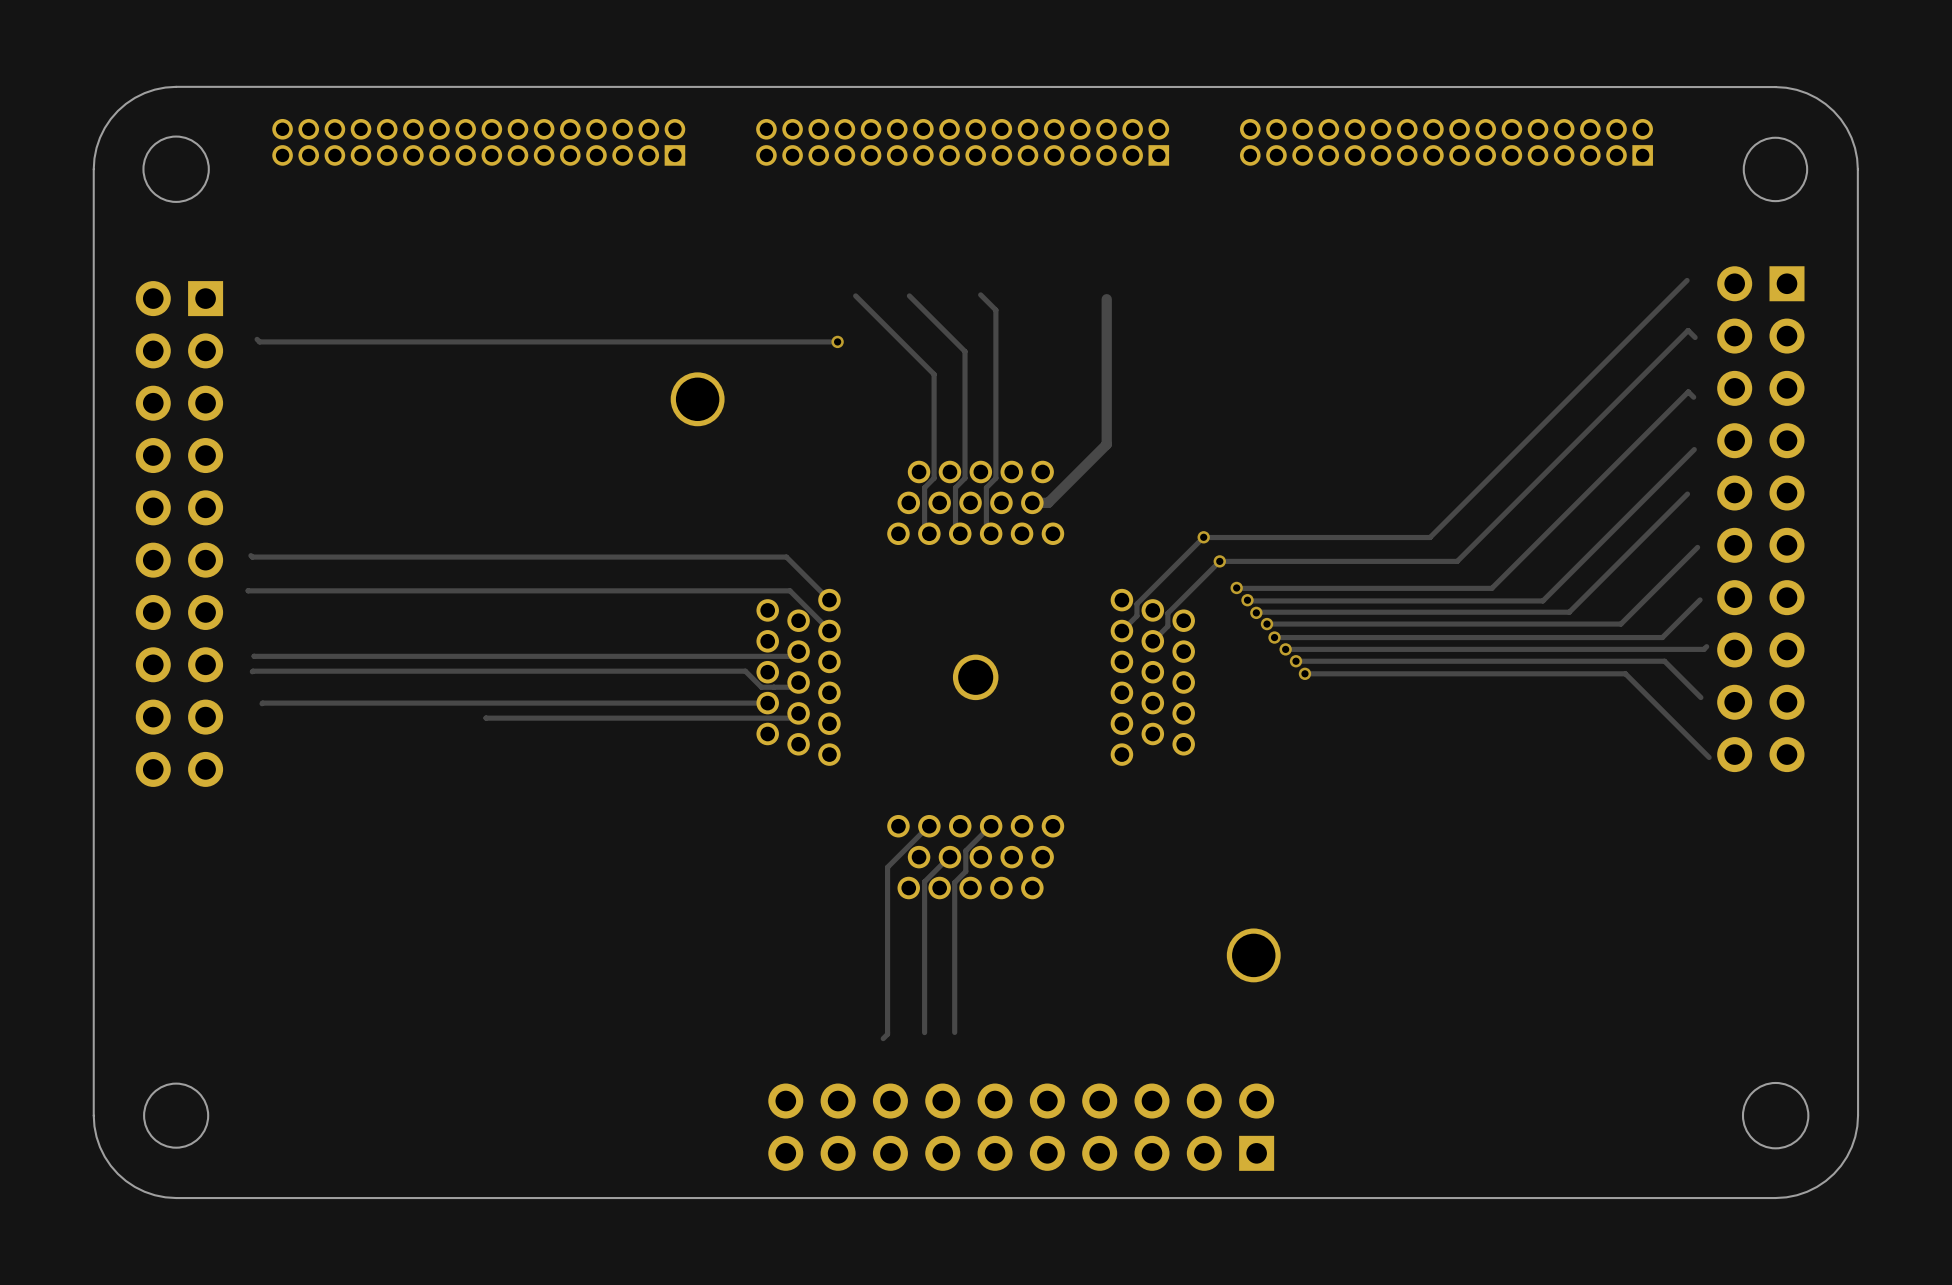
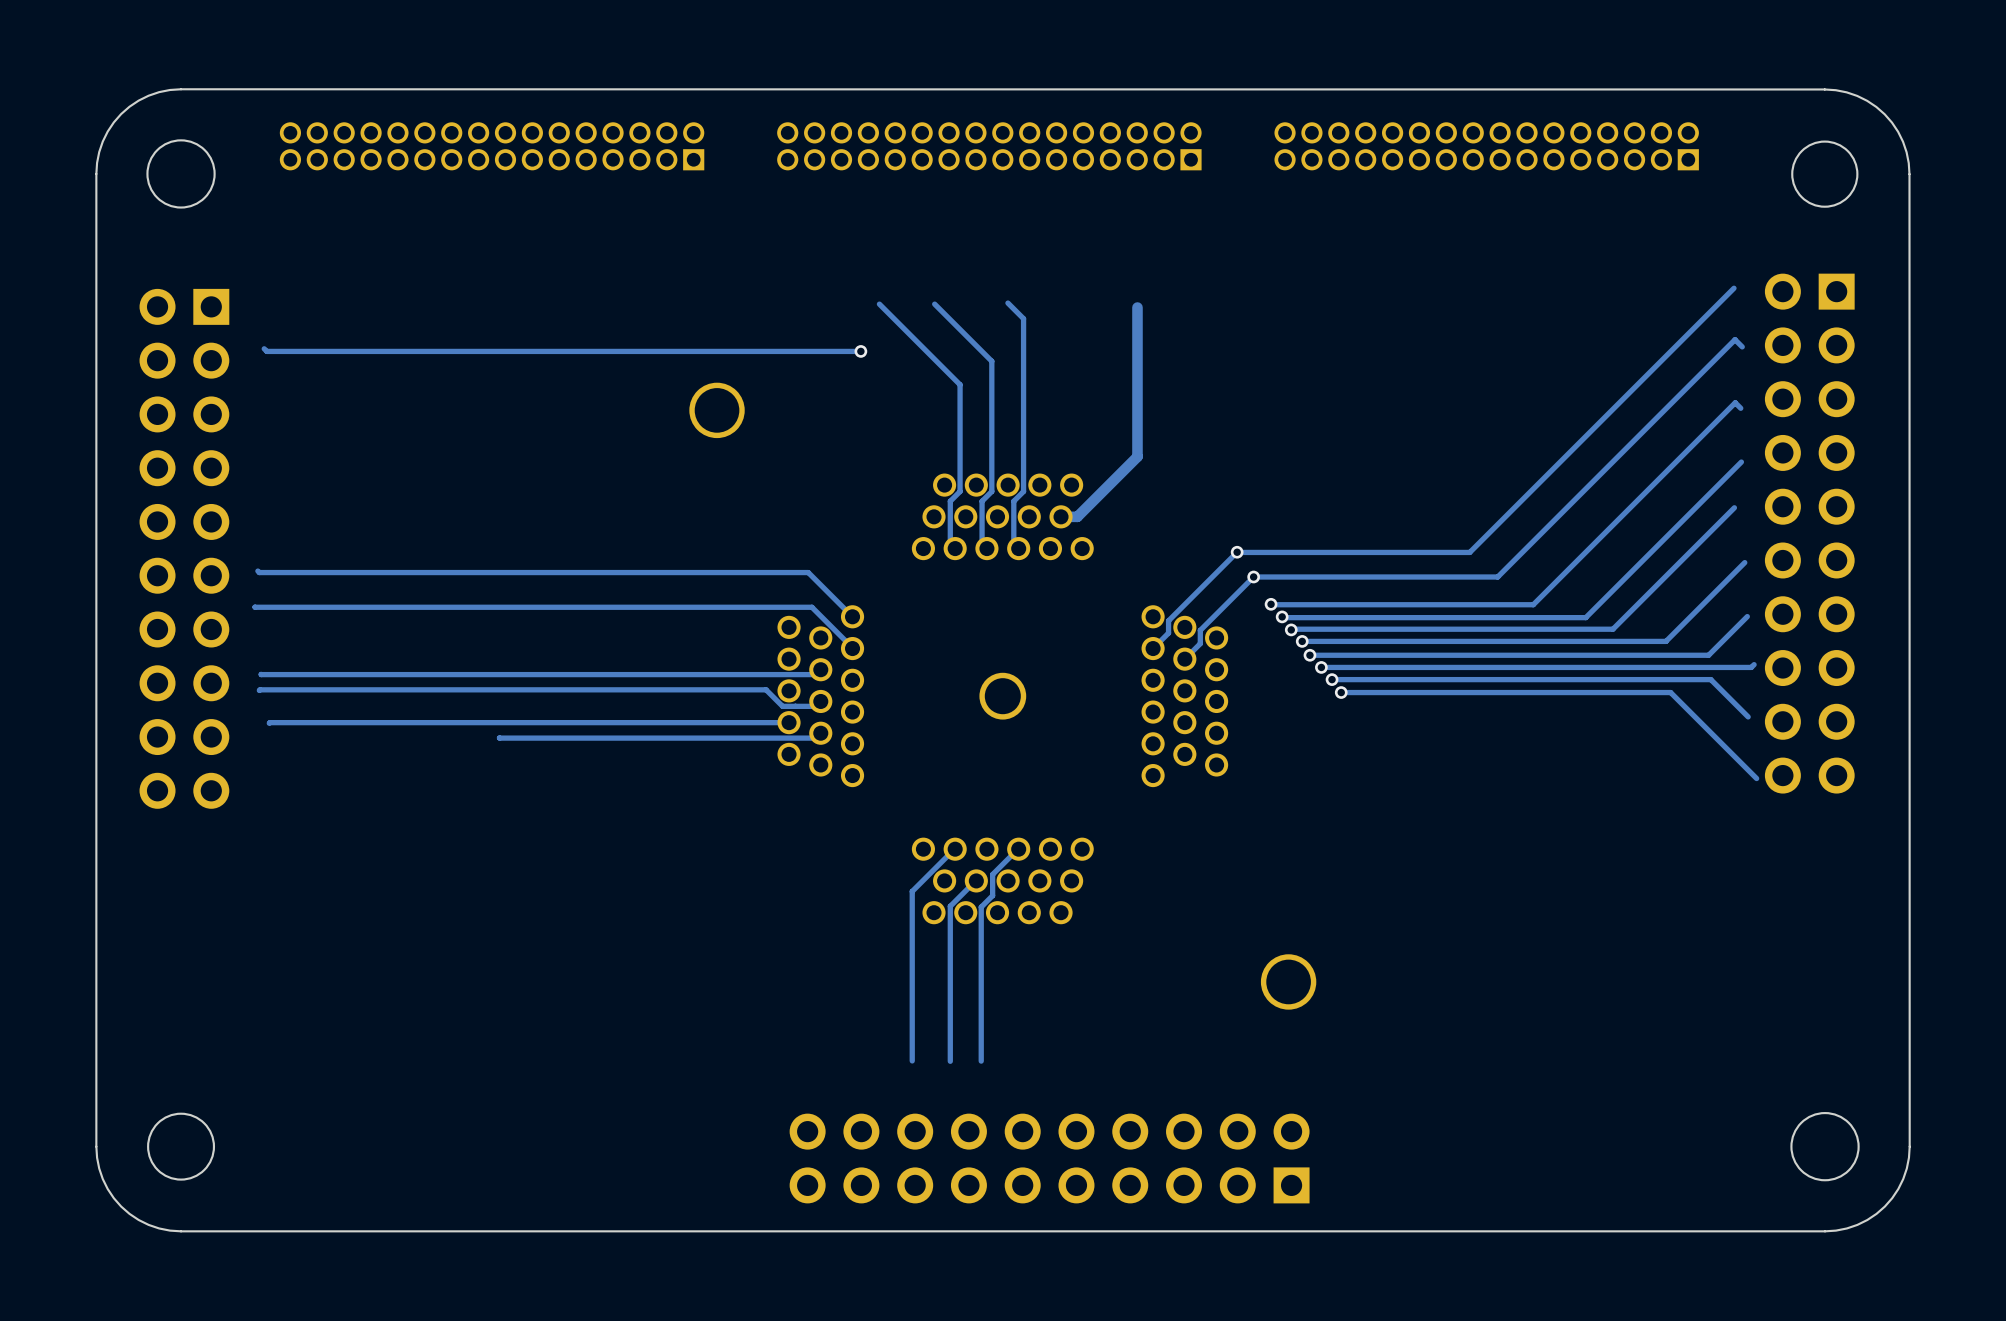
track: (887, 1032) (883, 1038) -> none

